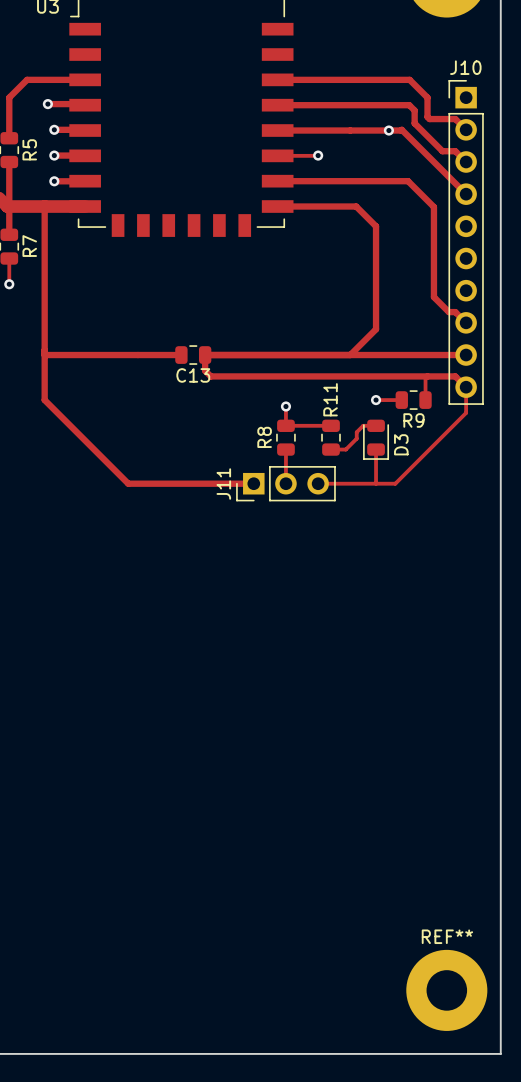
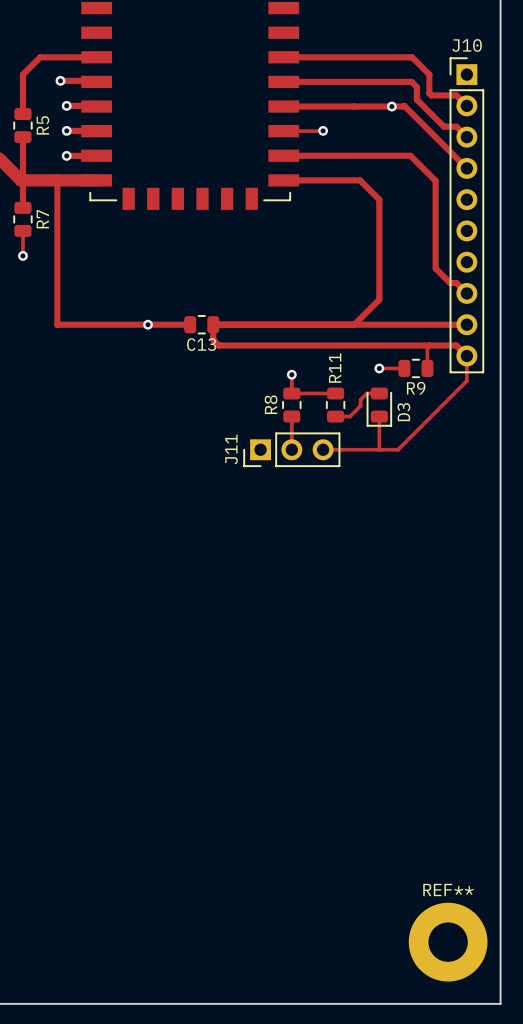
track: (44, 355) (44, 400) (128, 483) (253, 483) -> none
via: none -> (148, 324)

